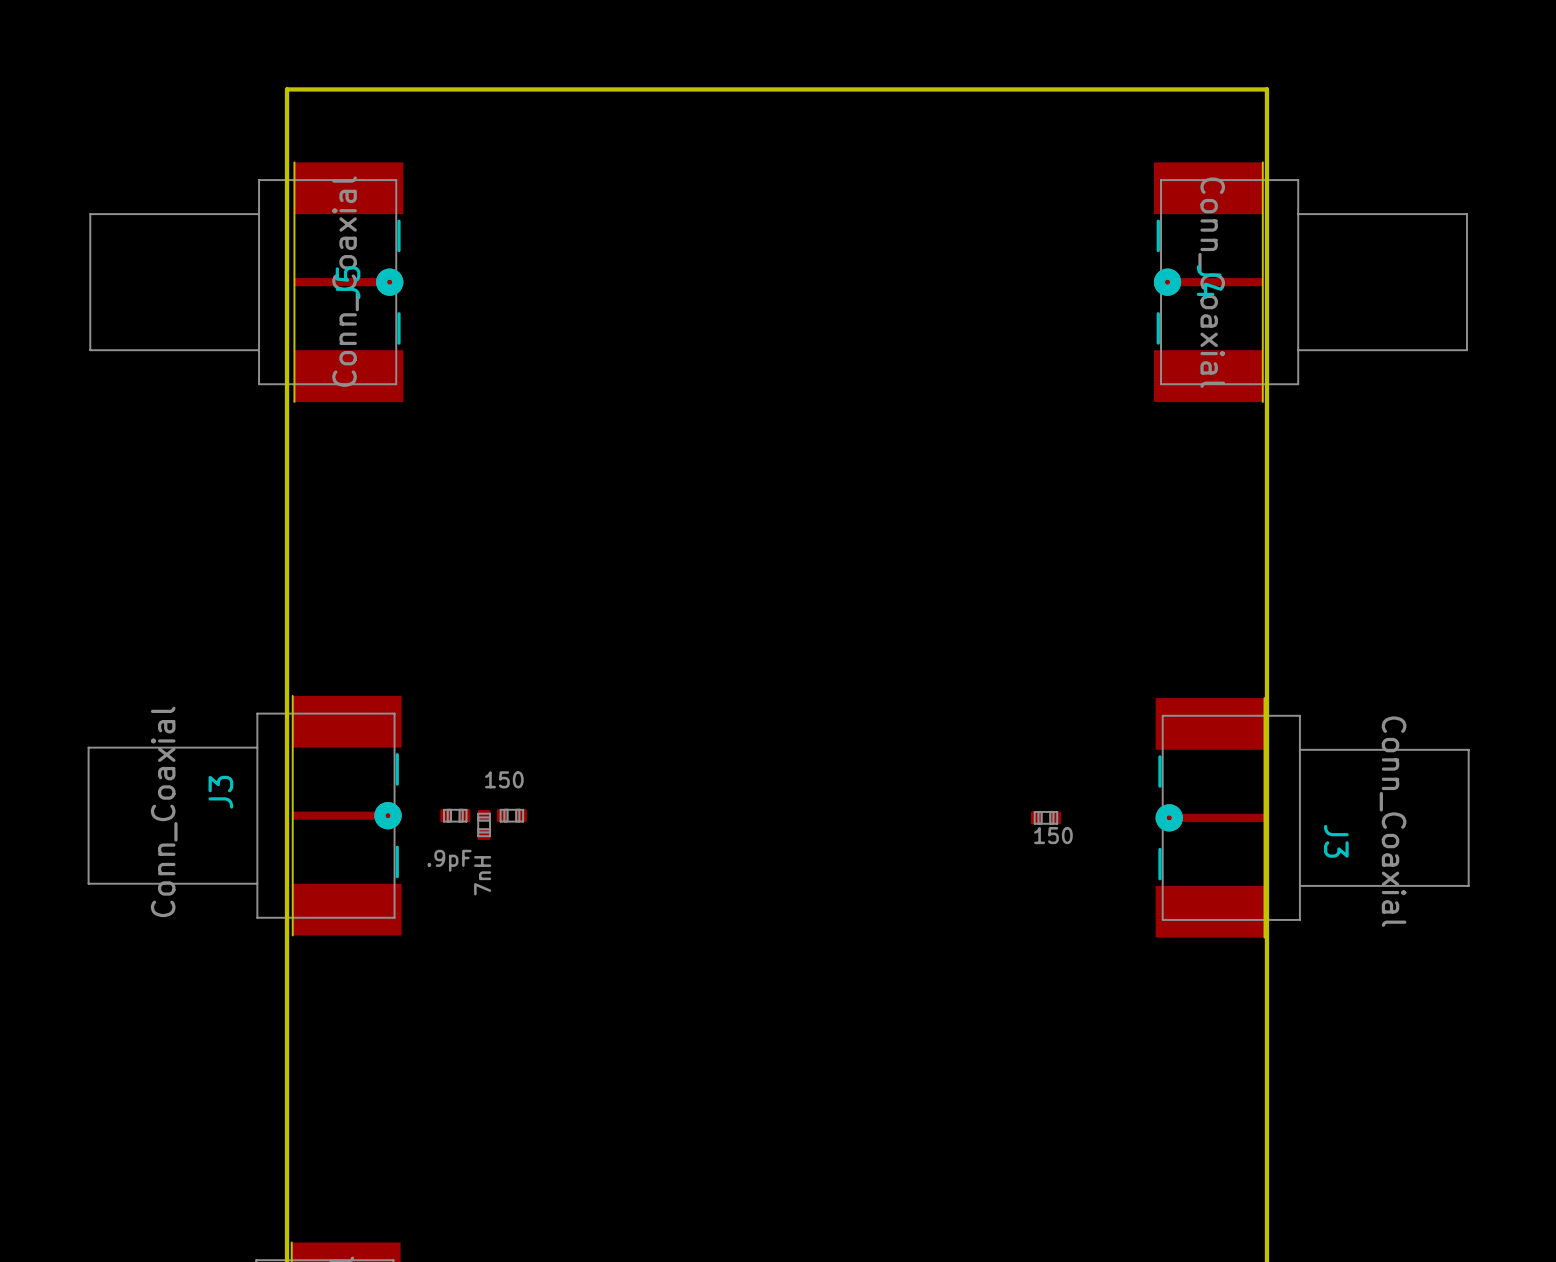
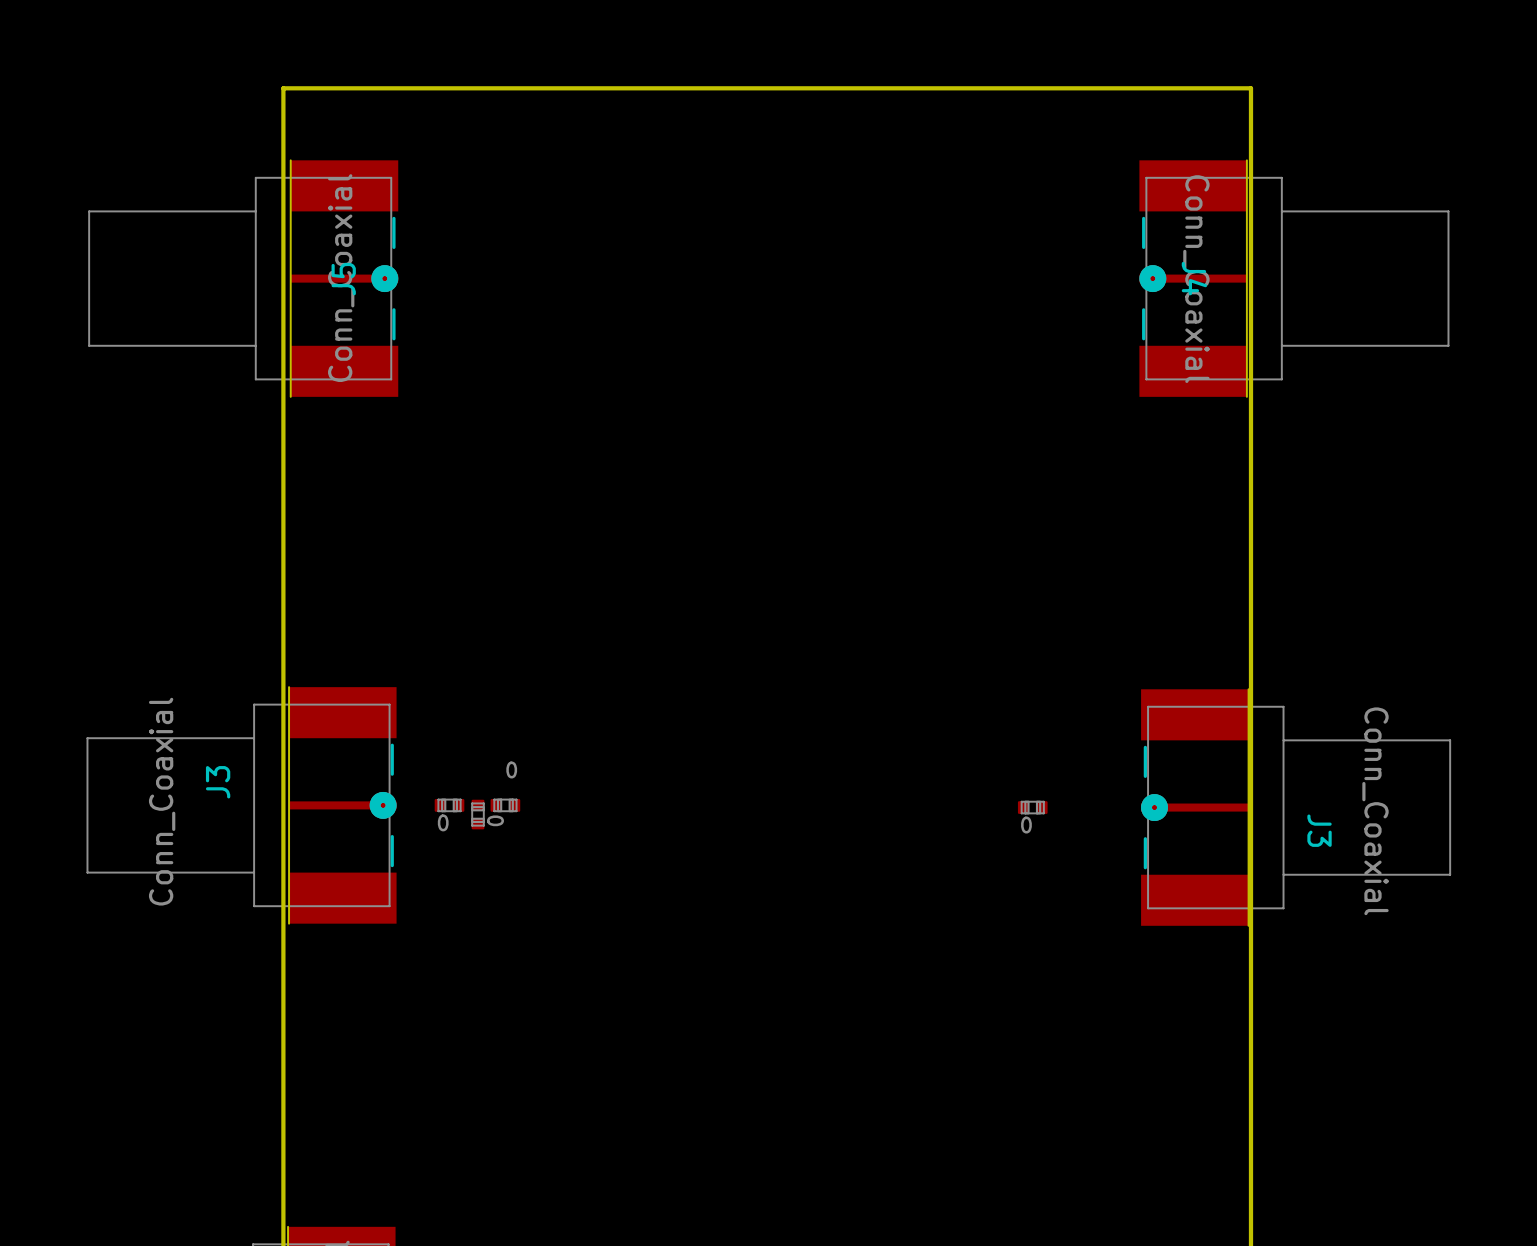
part value: 150 (504, 779) -> 0 (511, 769)
part value: 150 (1053, 835) -> 0 (1026, 825)
part value: .9pF (449, 860) -> 0 (443, 822)
part value: 7nH (482, 875) -> 0 (495, 820)

